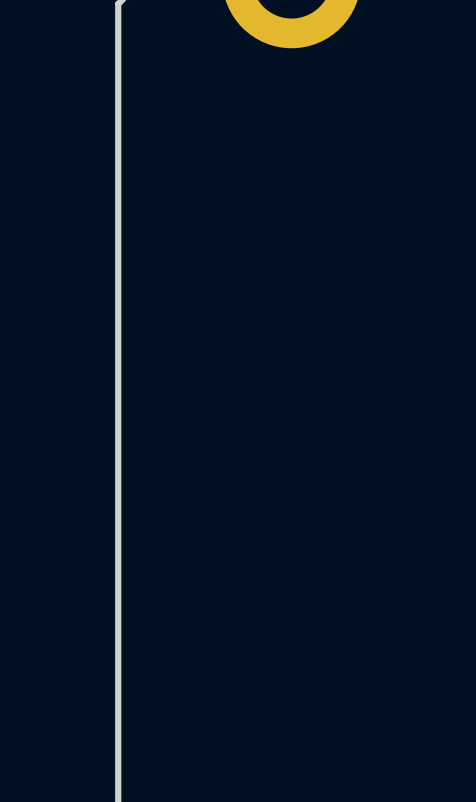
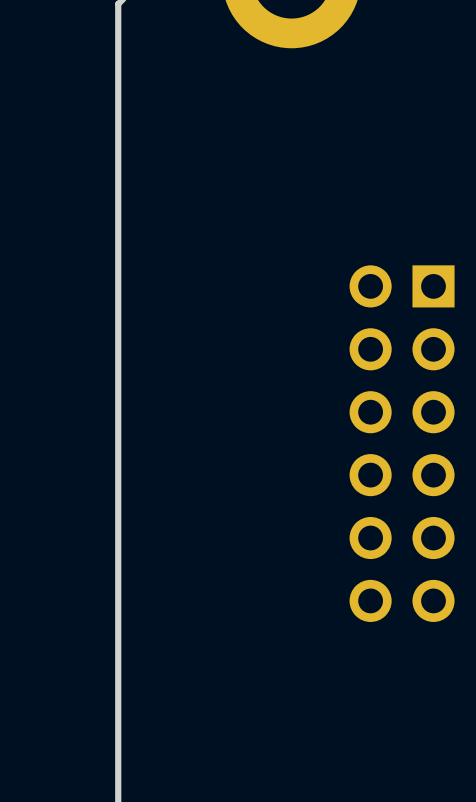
part: none -> (402, 443)

